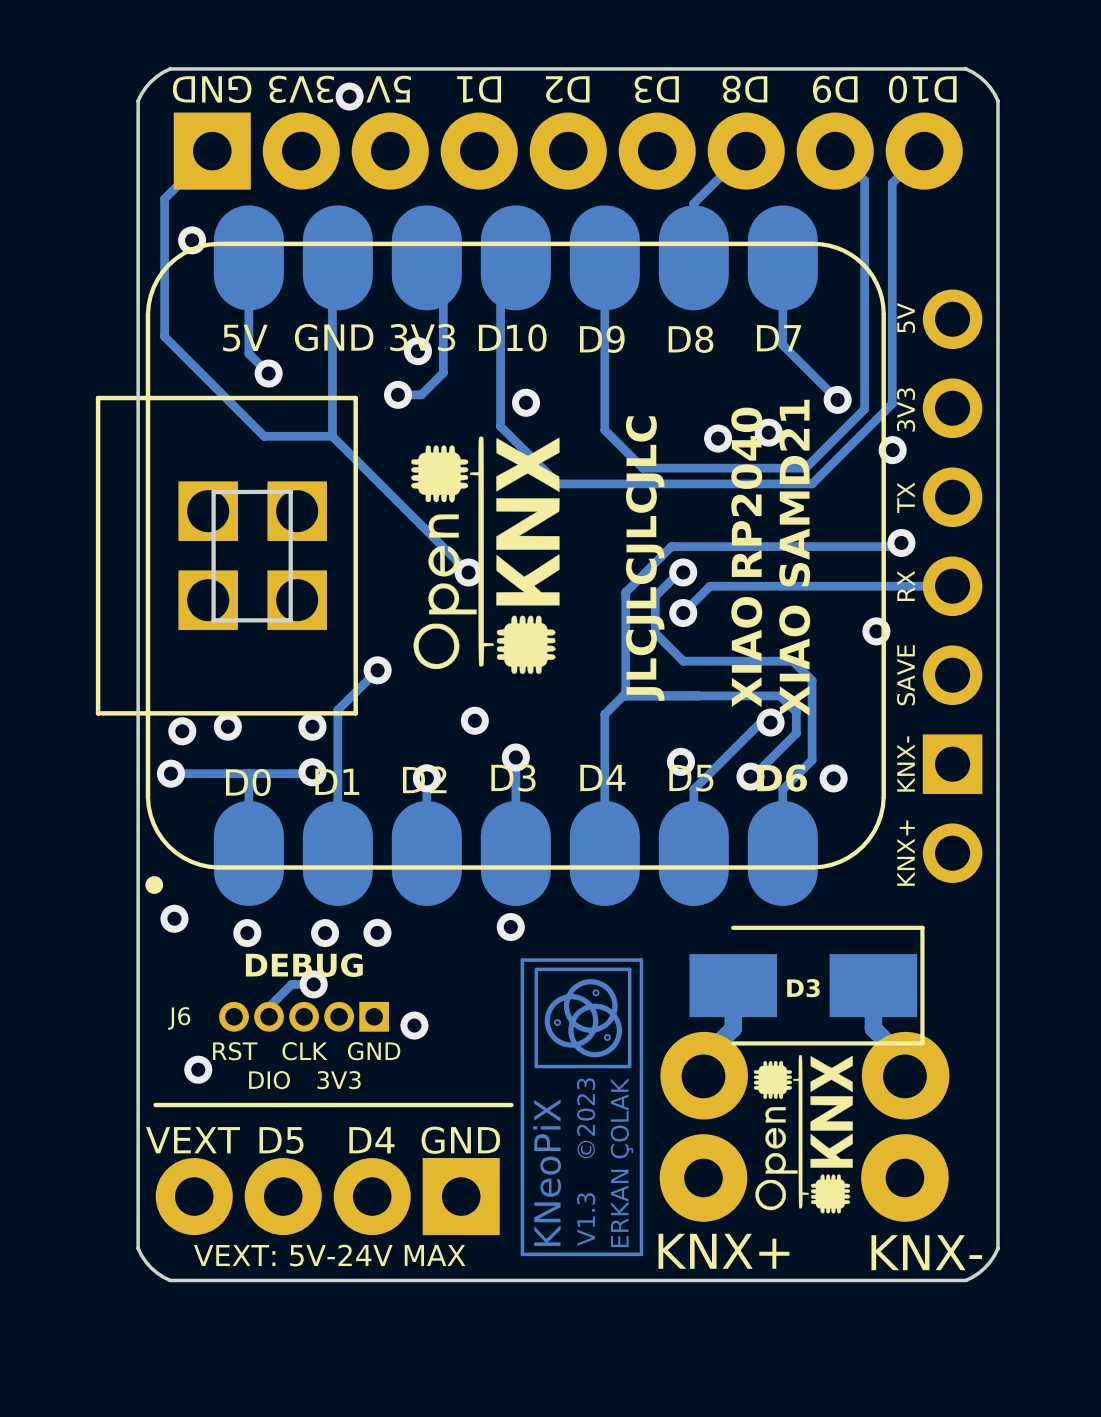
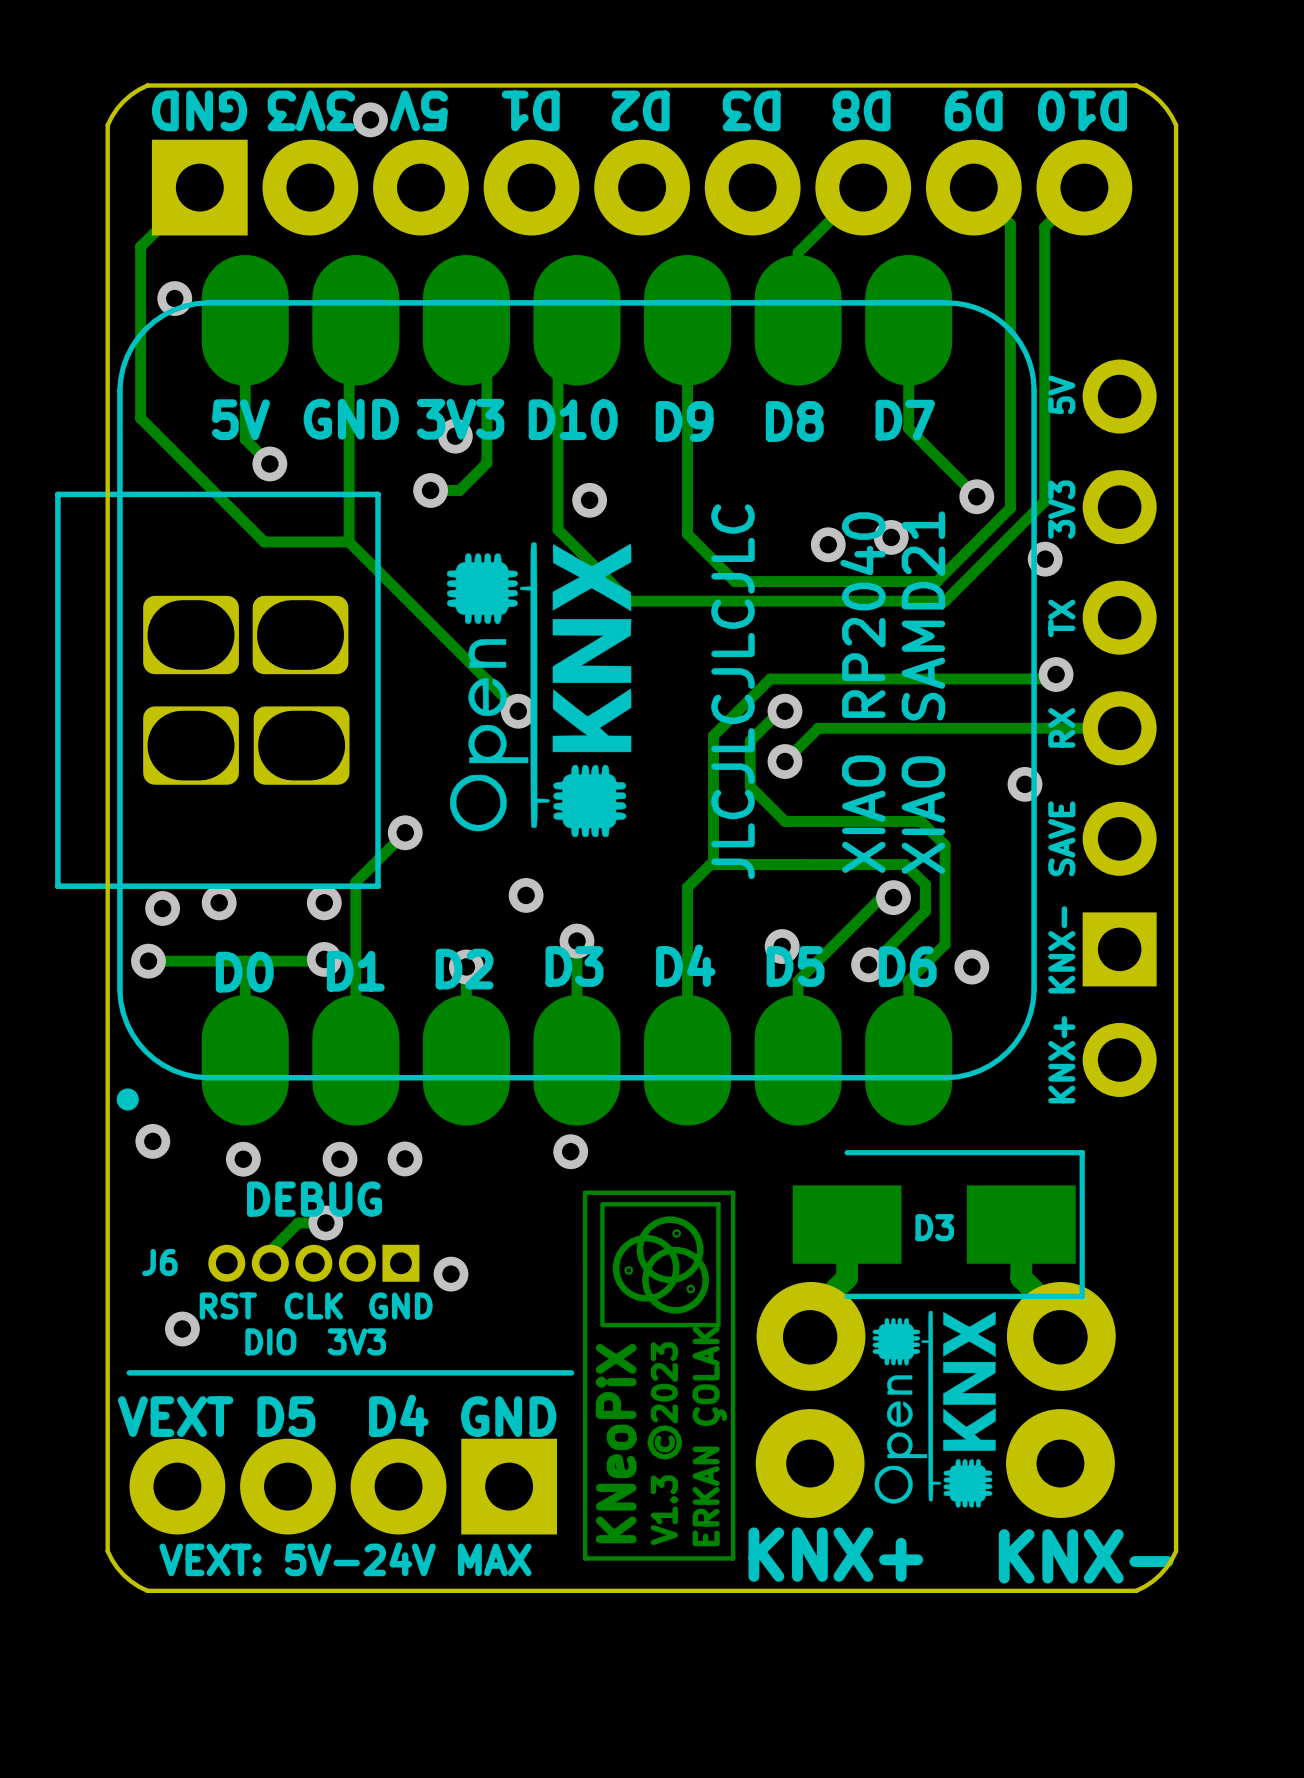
part footprint: [95, 205, 886, 907] -> [55, 254, 1037, 1126]

